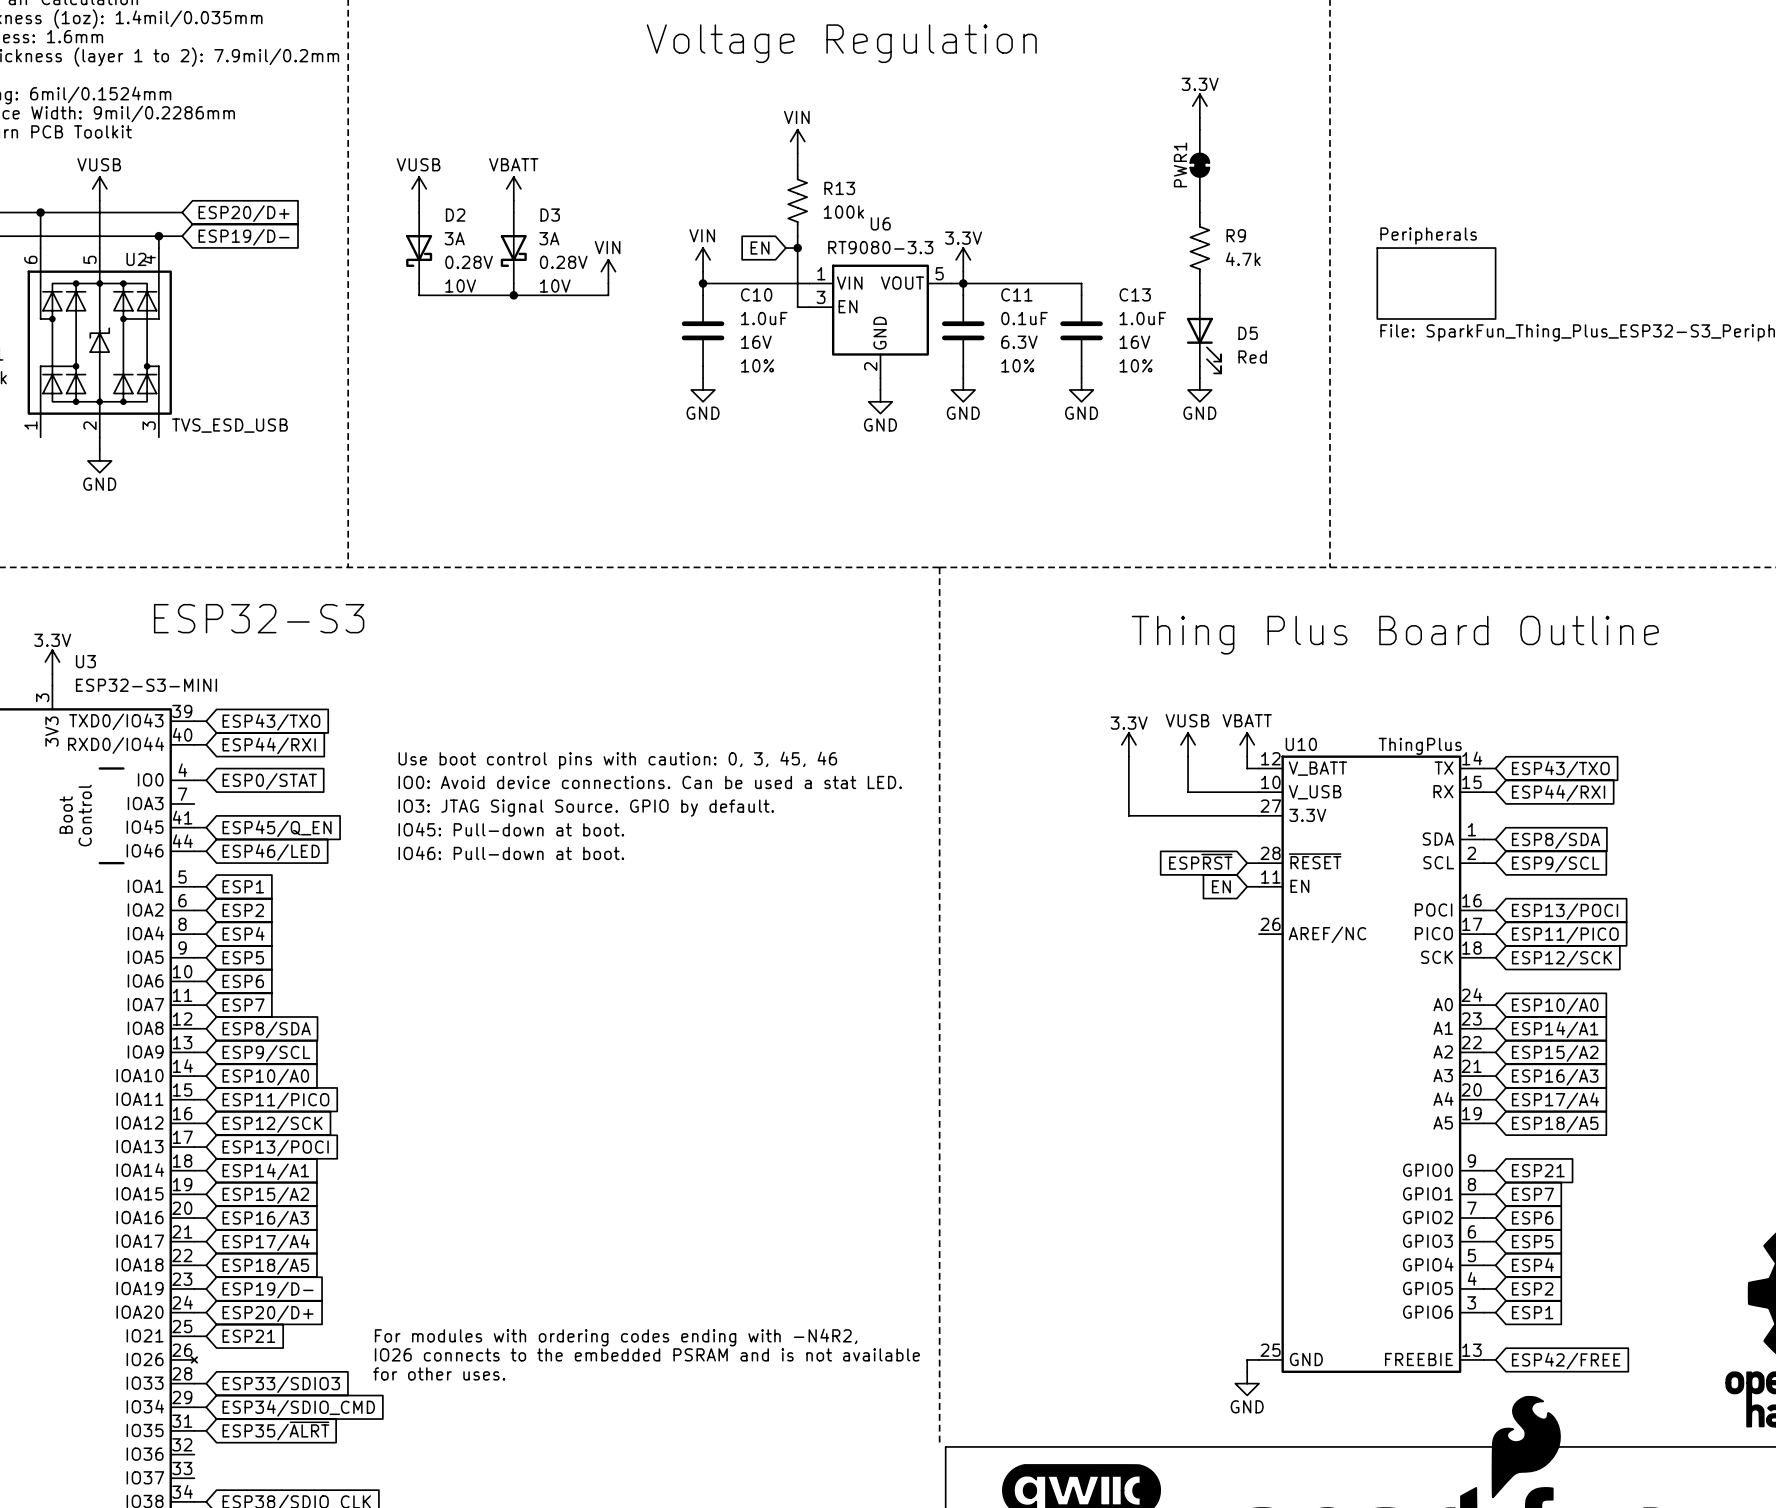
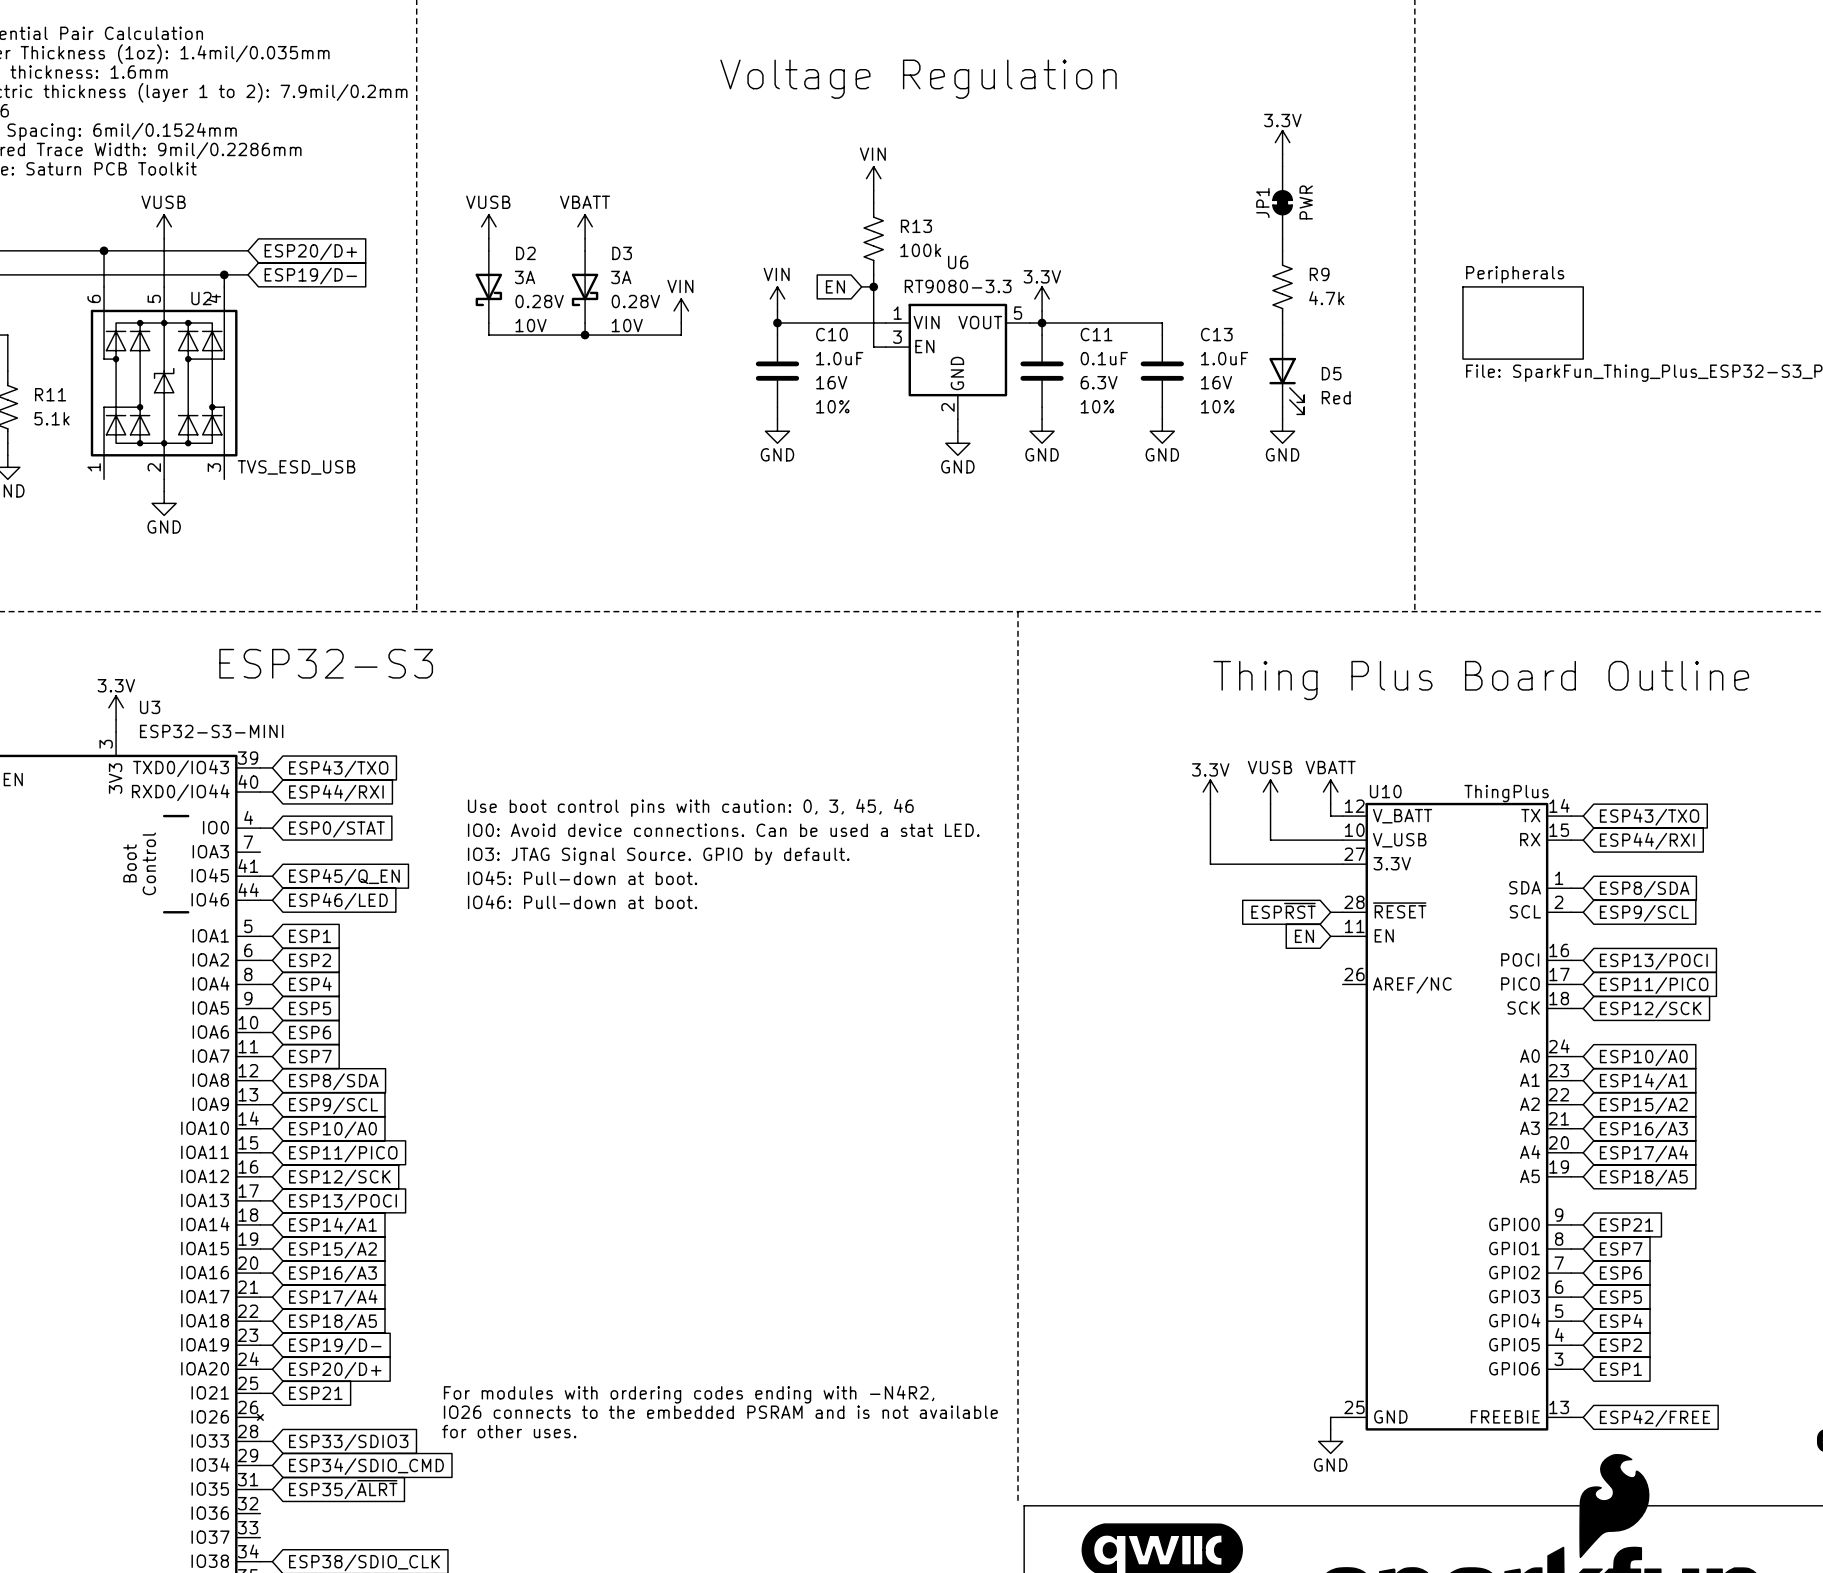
PWR1 name: PWR1 (1180, 164) -> JP1 (1262, 203)
PWR1 value: none -> PWR (1306, 202)

